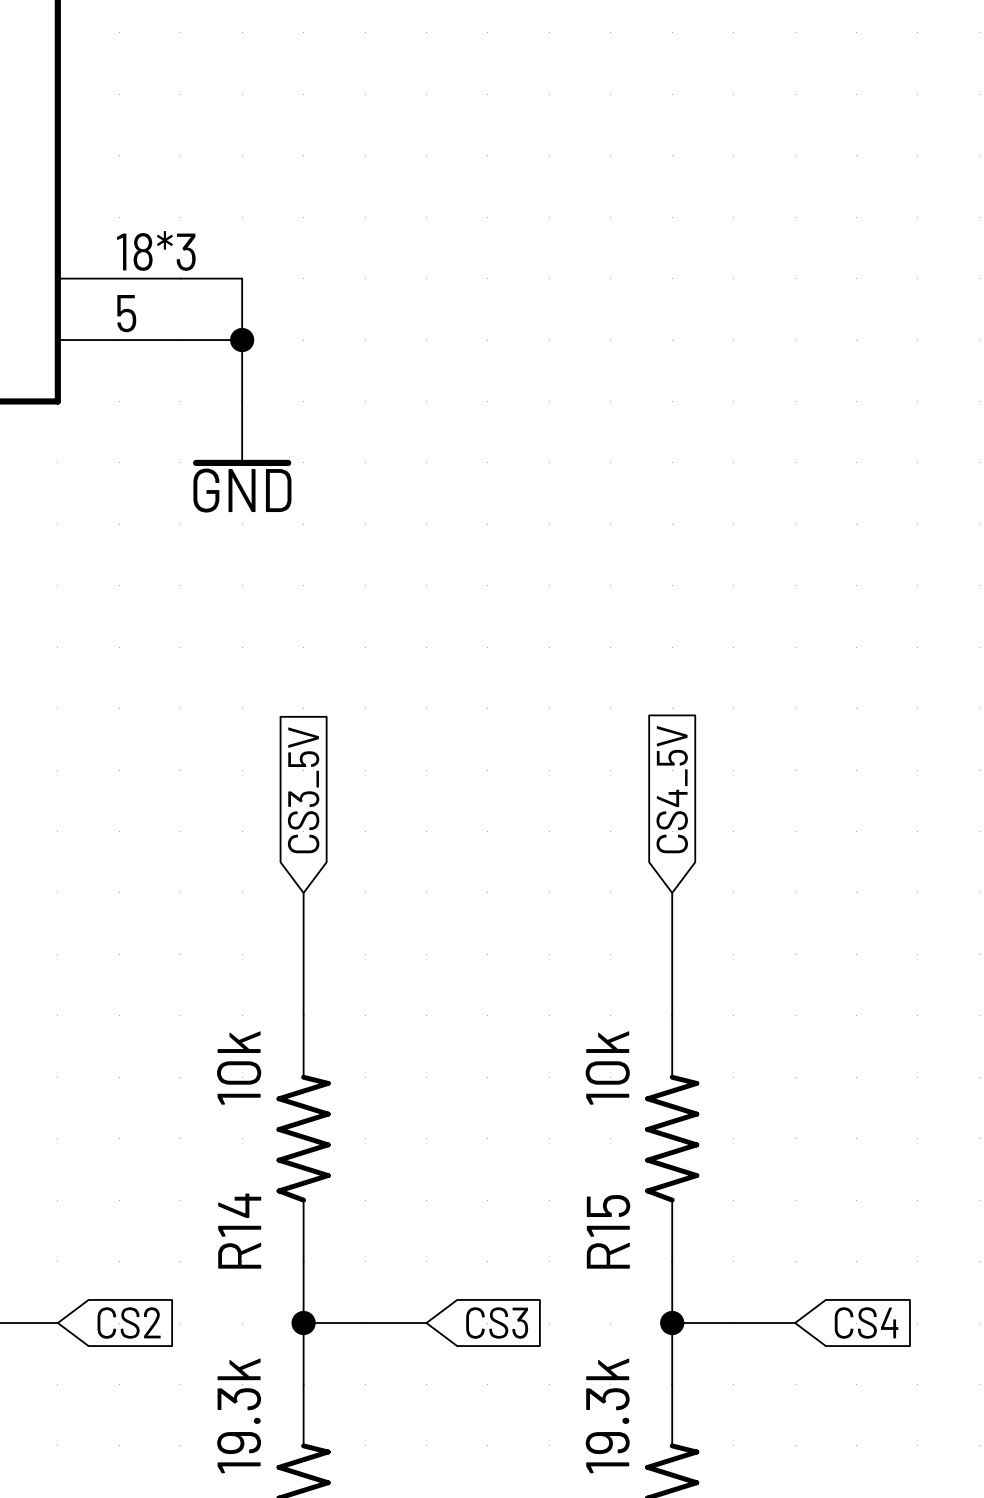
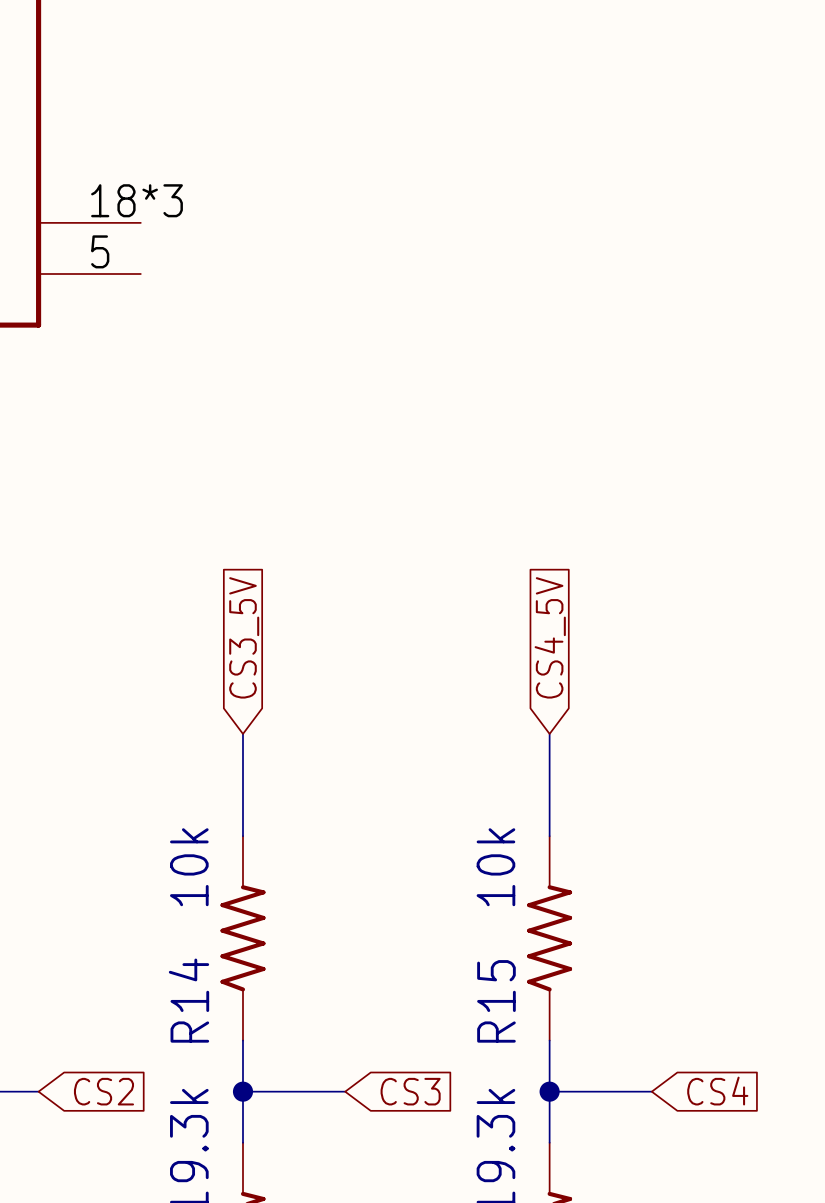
wire: (180, 278) (242, 278) (242, 401) -> none
wire: (180, 340) (242, 340) -> none
junction: (242, 340) -> none
power symbol: GND (242, 433) -> none

